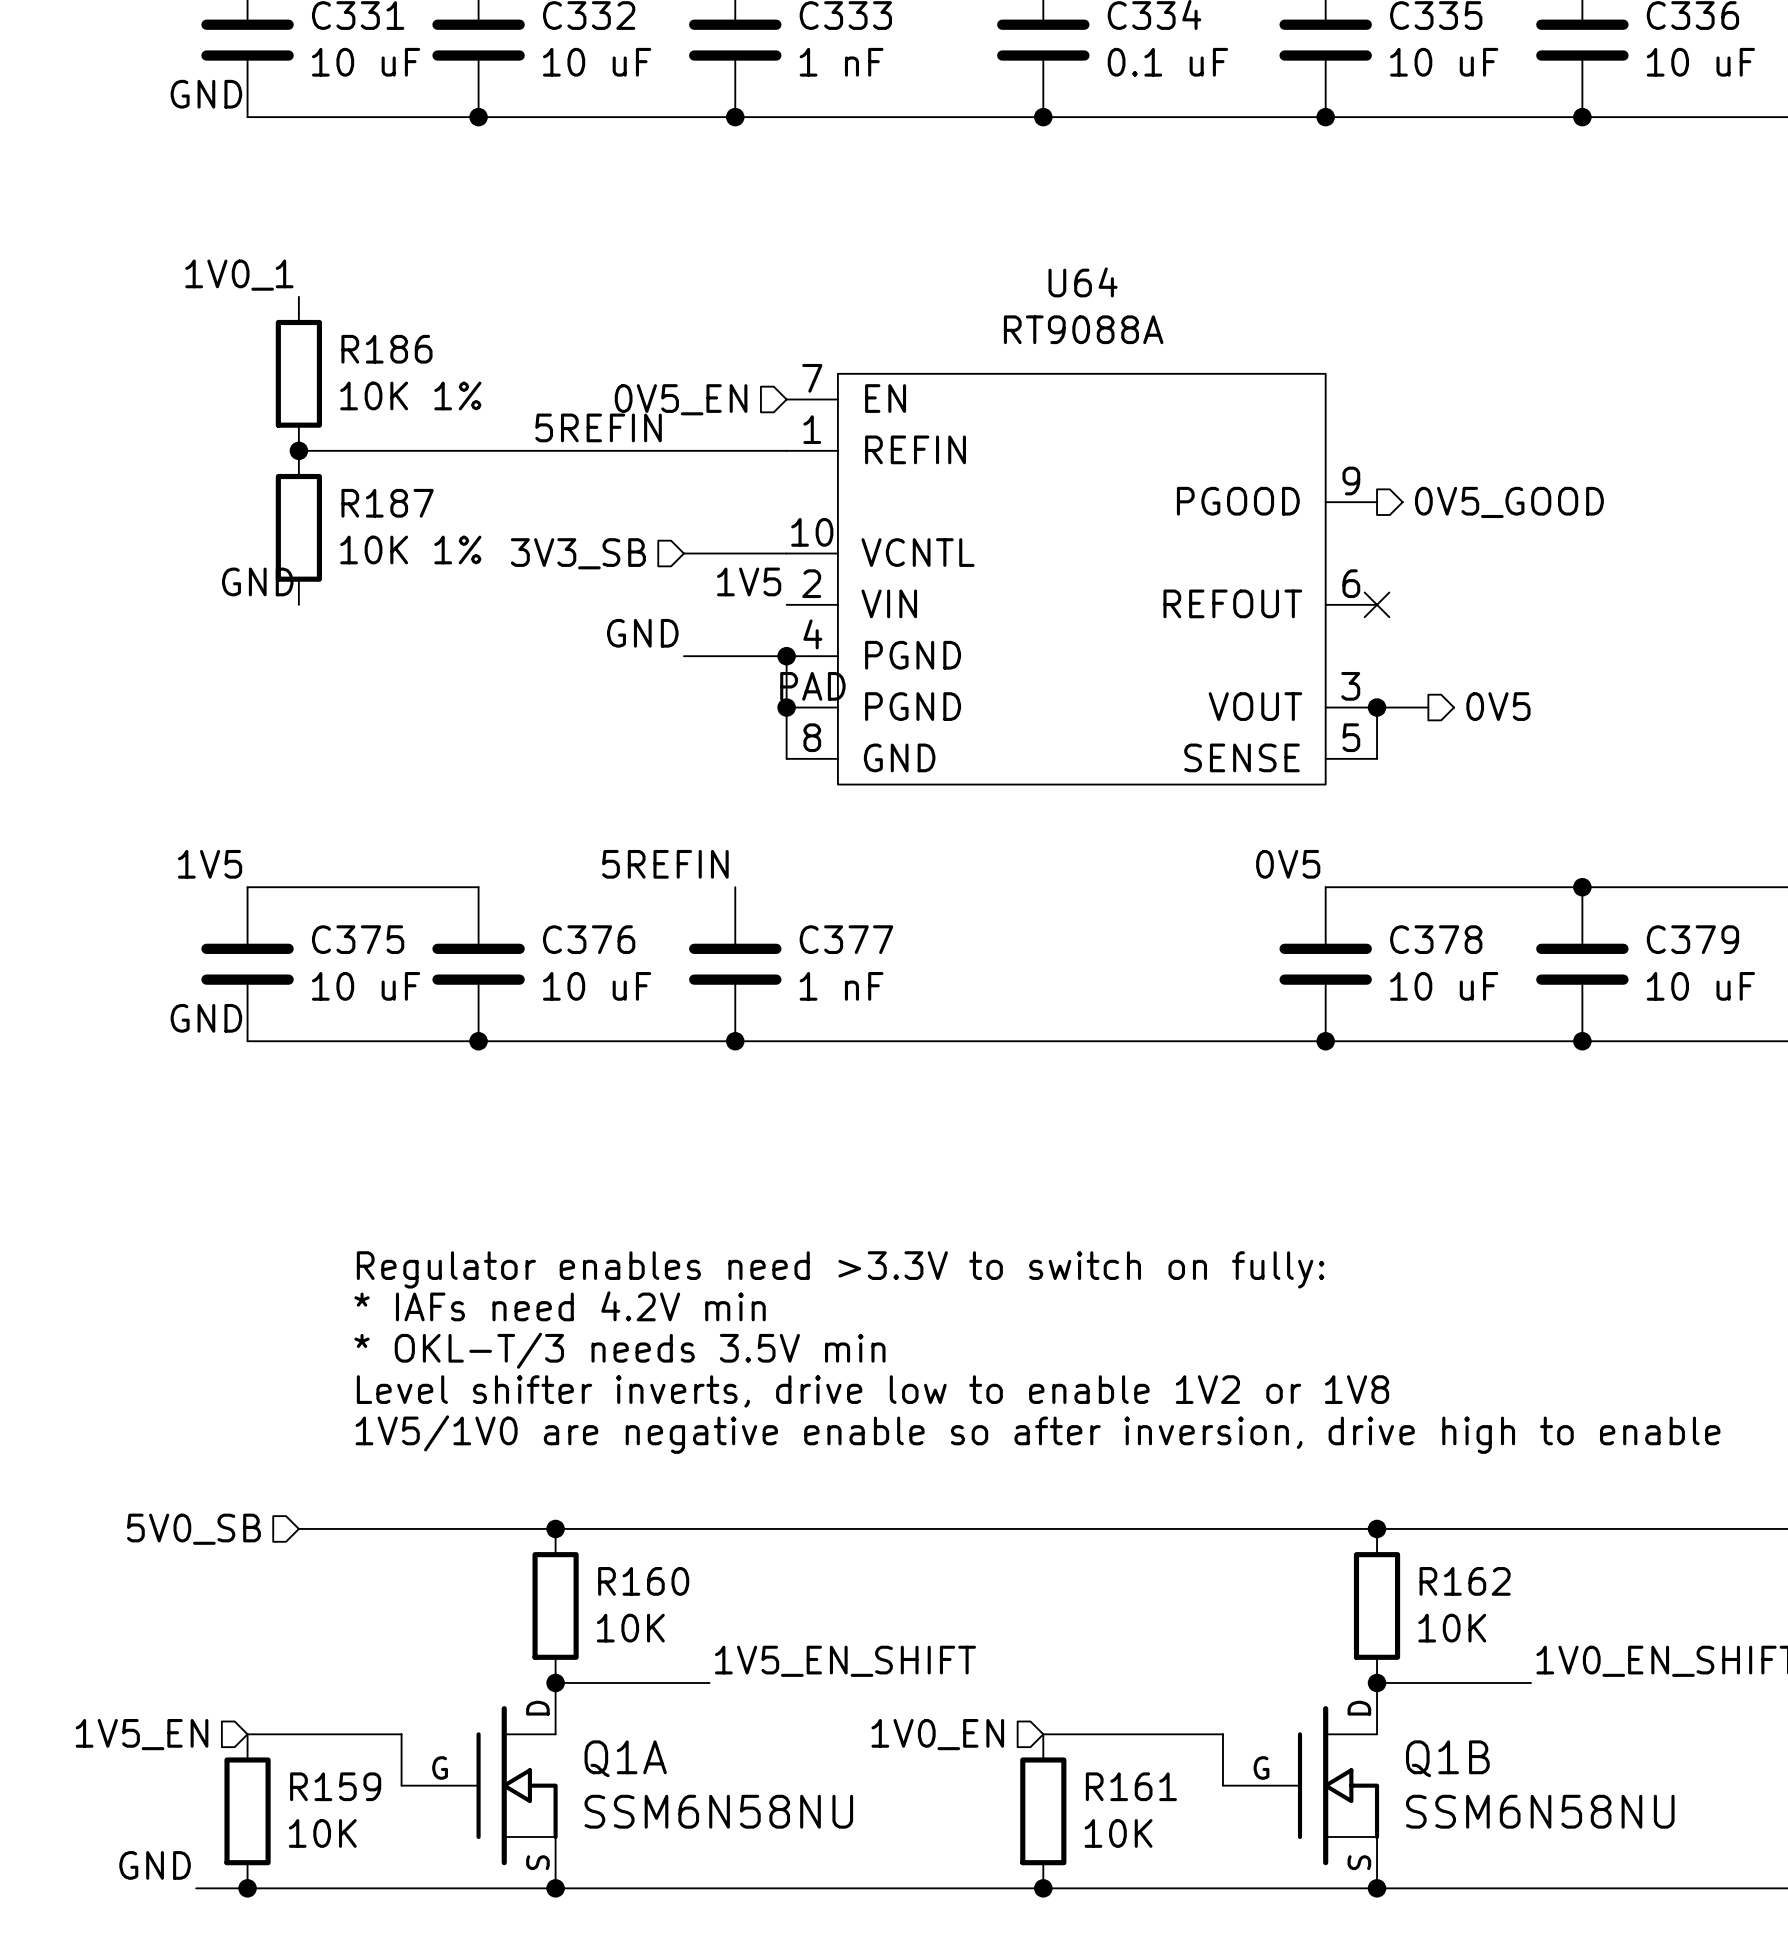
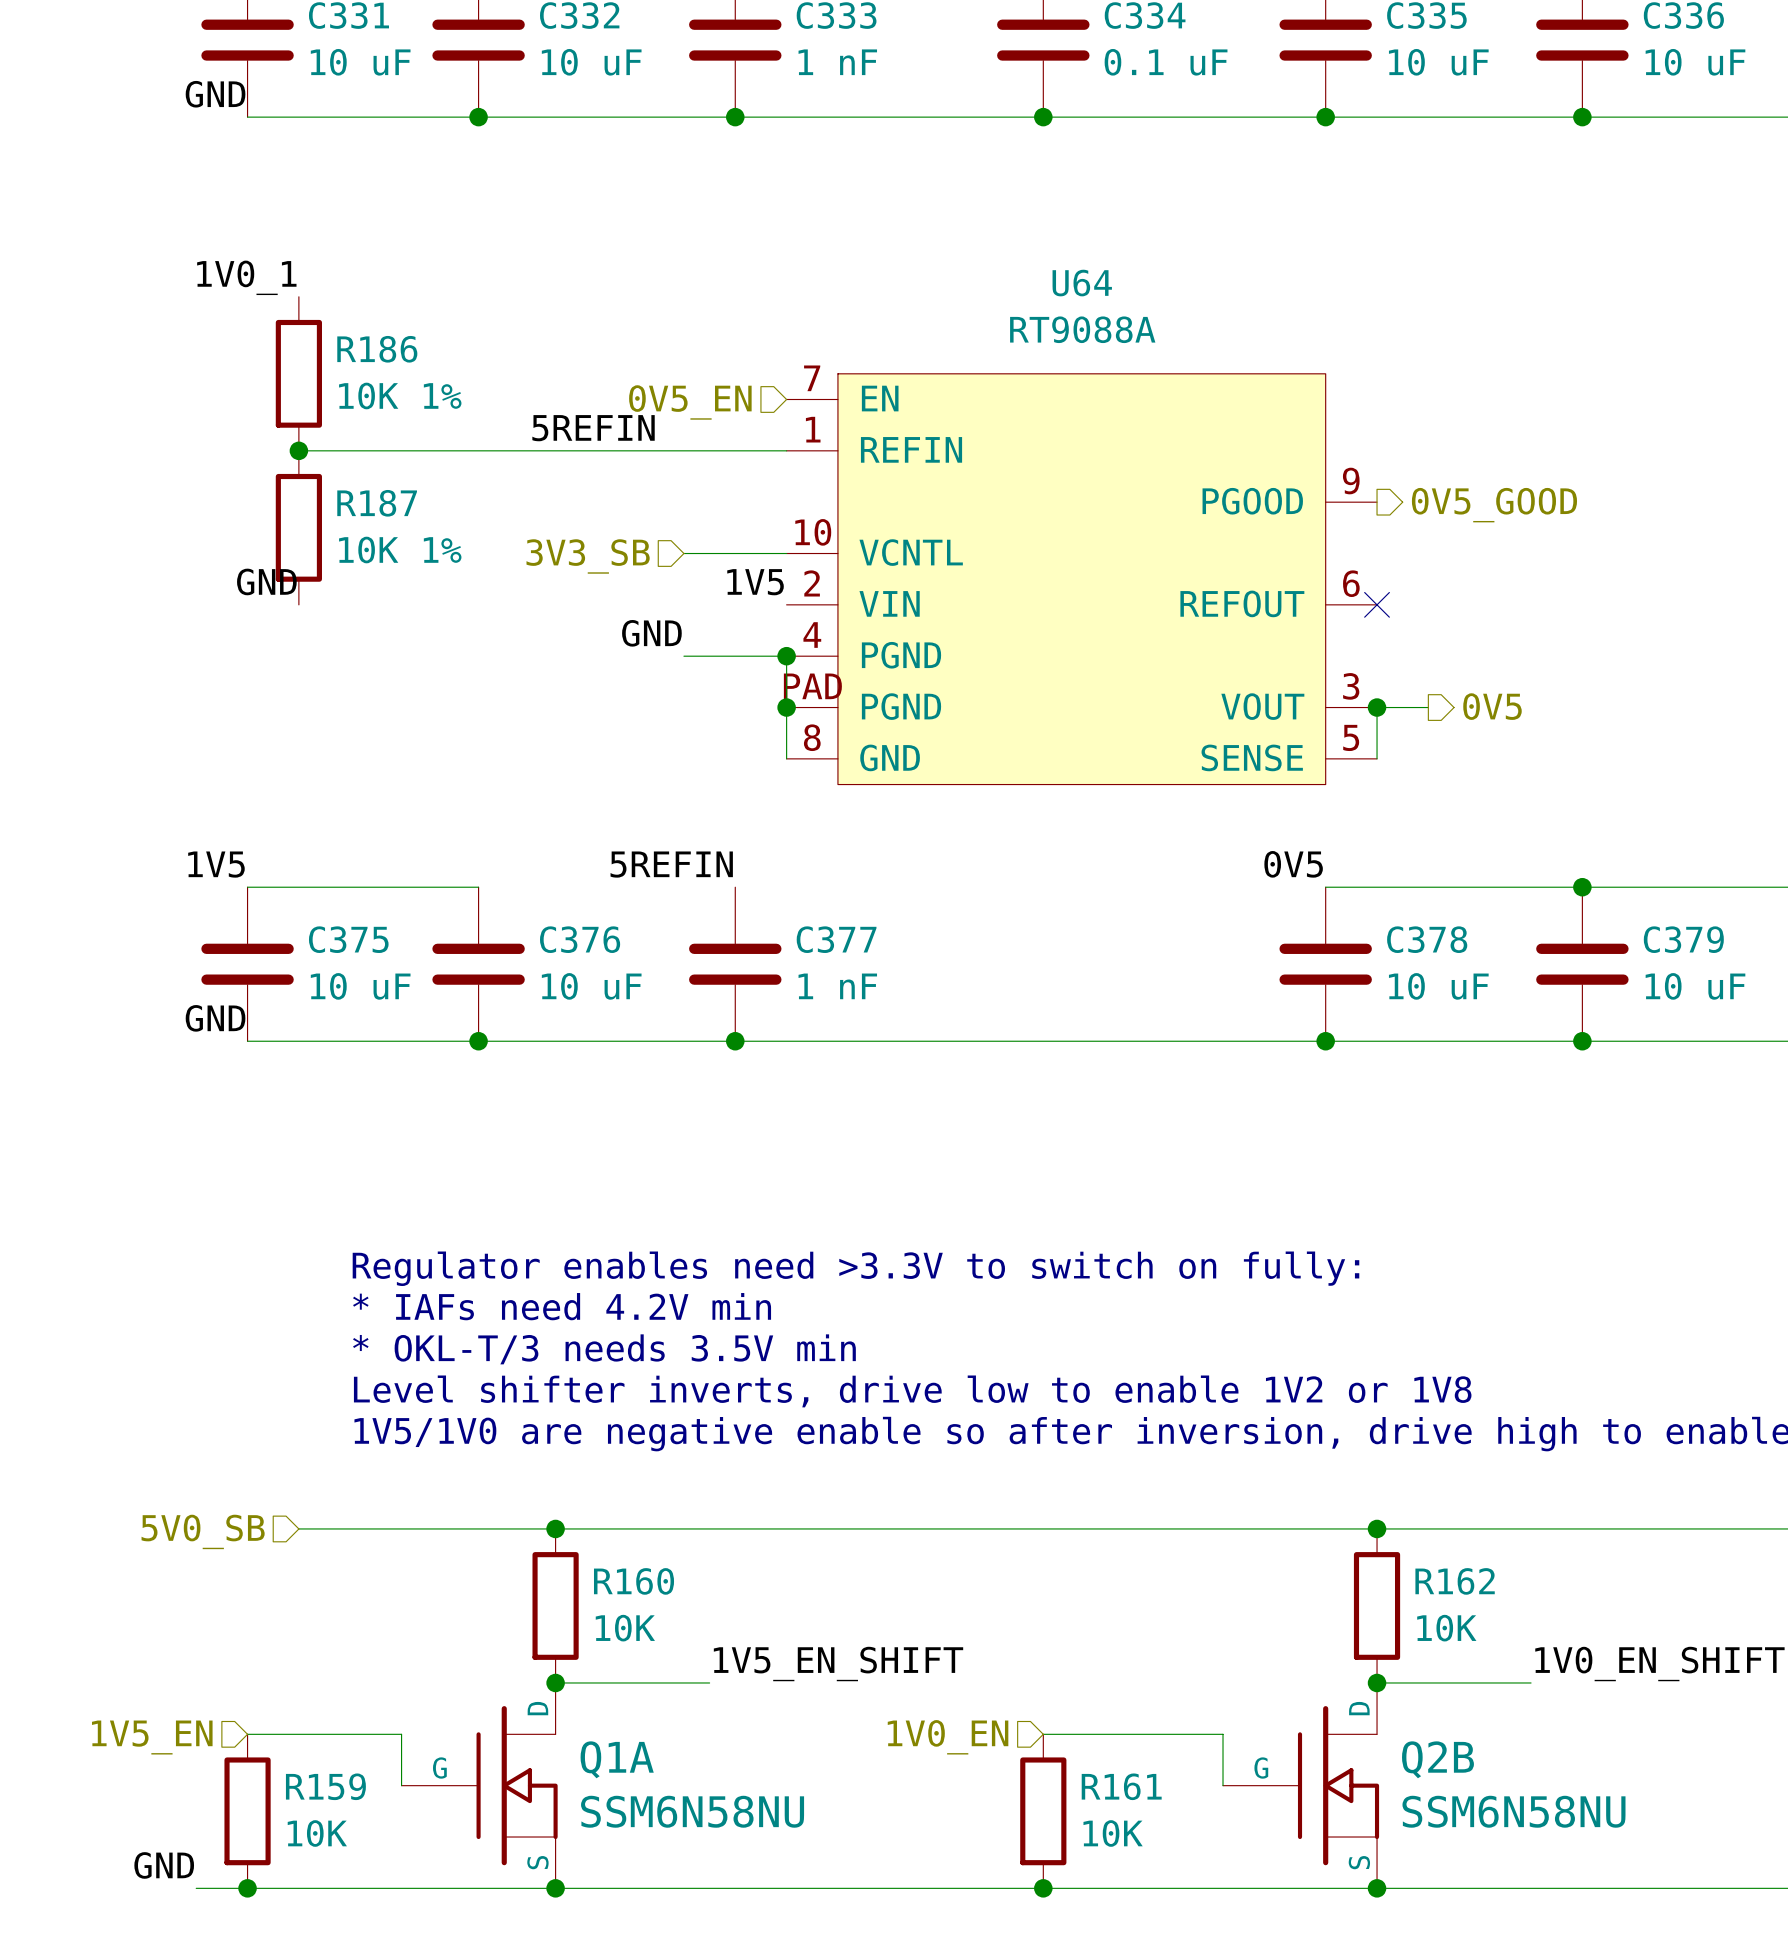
Q1B name: Q1B (1447, 1758) -> Q2B (1437, 1759)

